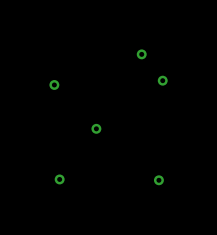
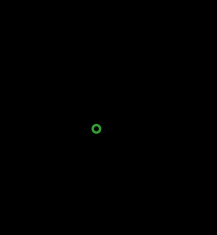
via: (141, 54) -> none
via: (162, 80) -> none
via: (54, 84) -> none
via: (59, 179) -> none
via: (158, 180) -> none

